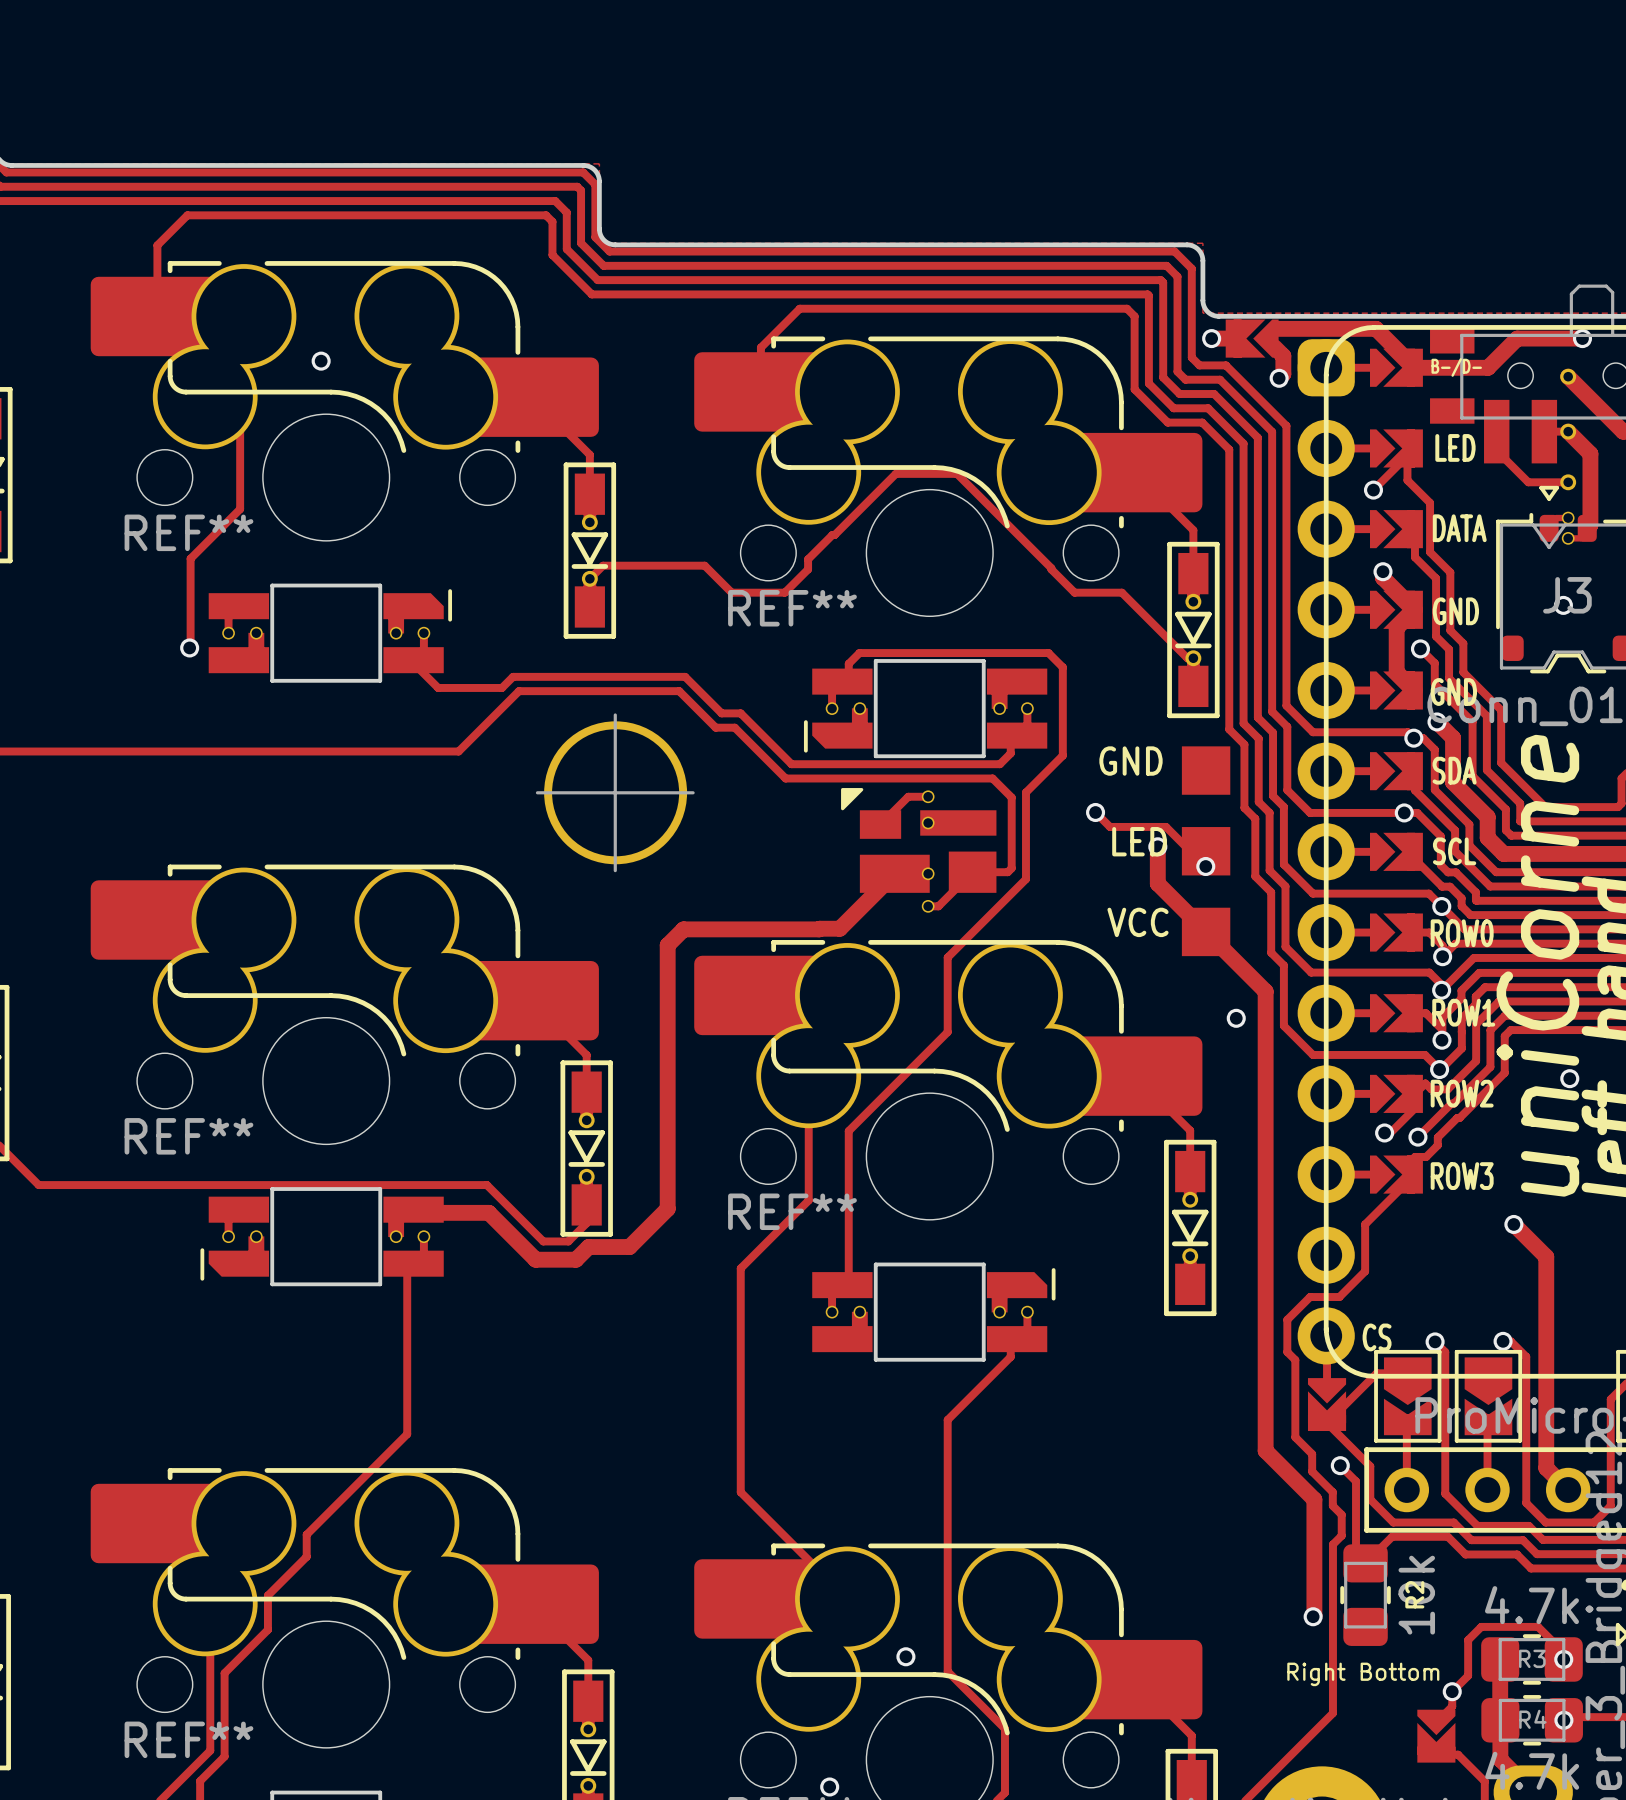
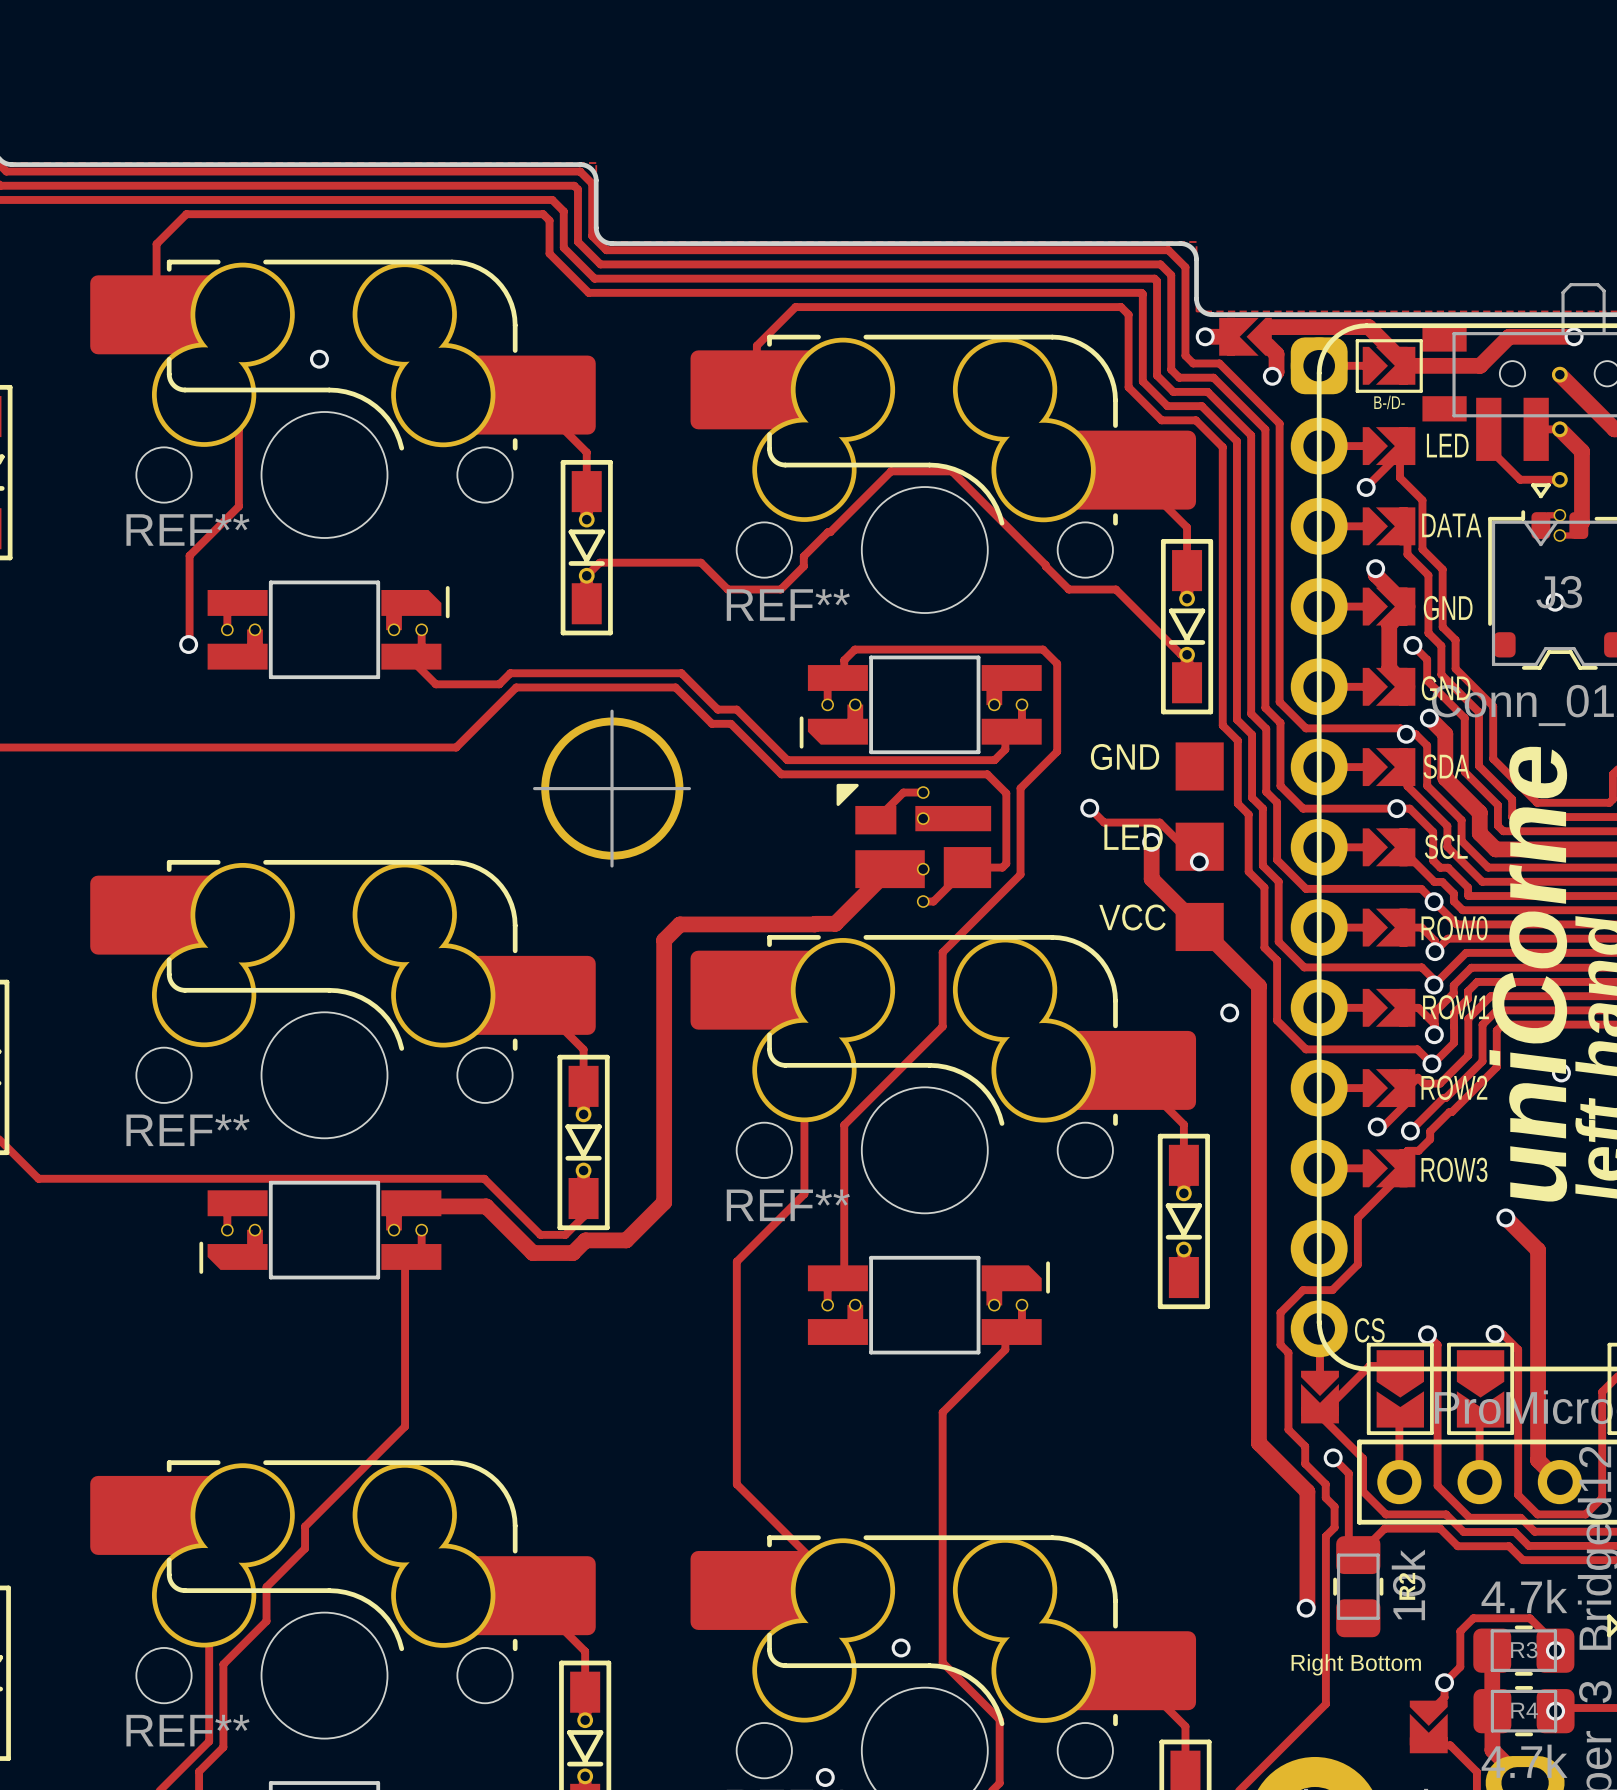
line: none -> (1357, 340) (1421, 340) (1421, 391) (1357, 391) (1357, 340)
part text position: B-/D- (1456, 367) -> B-/D- (1389, 402)

